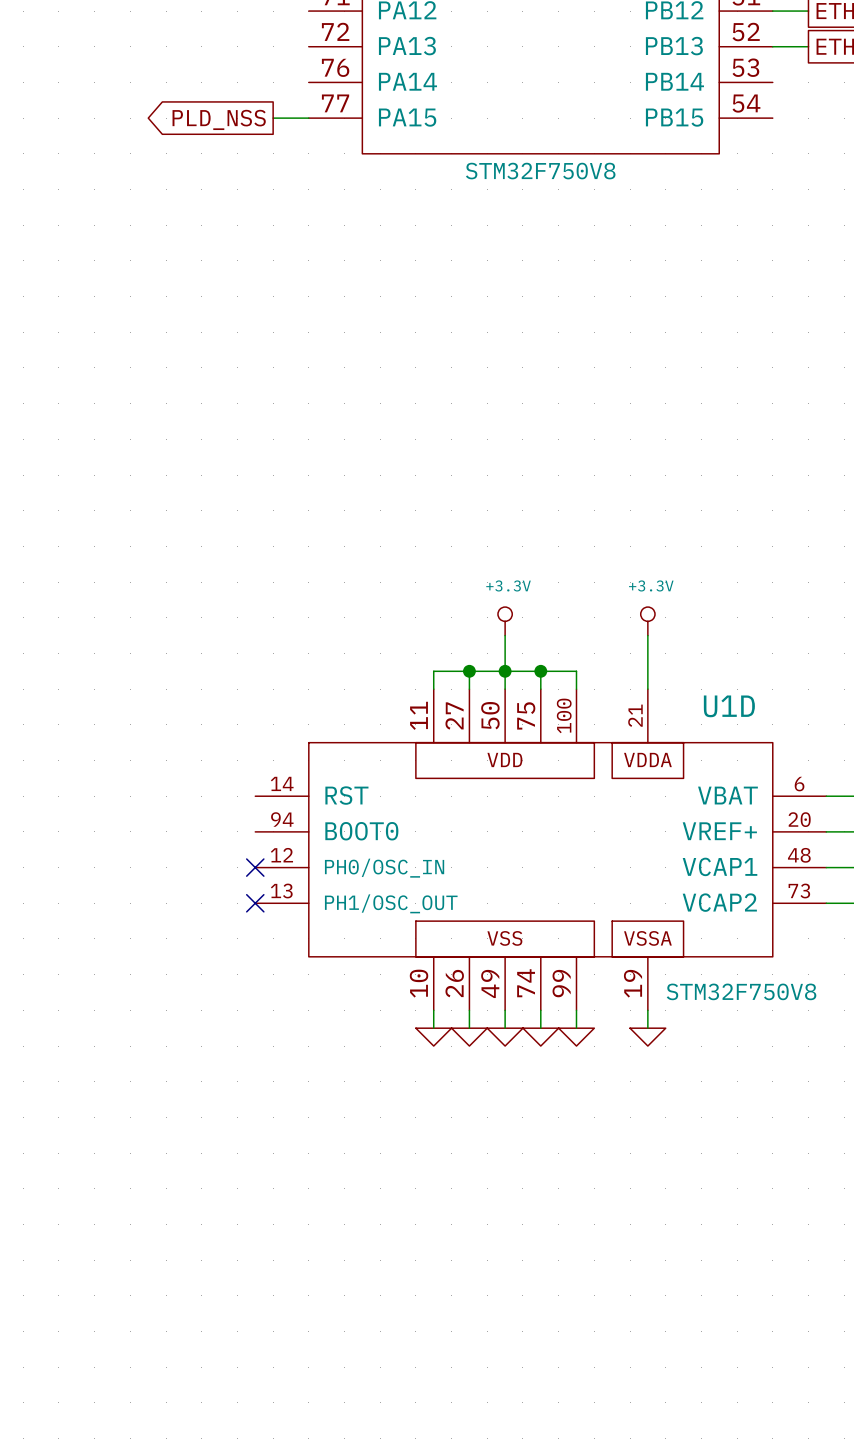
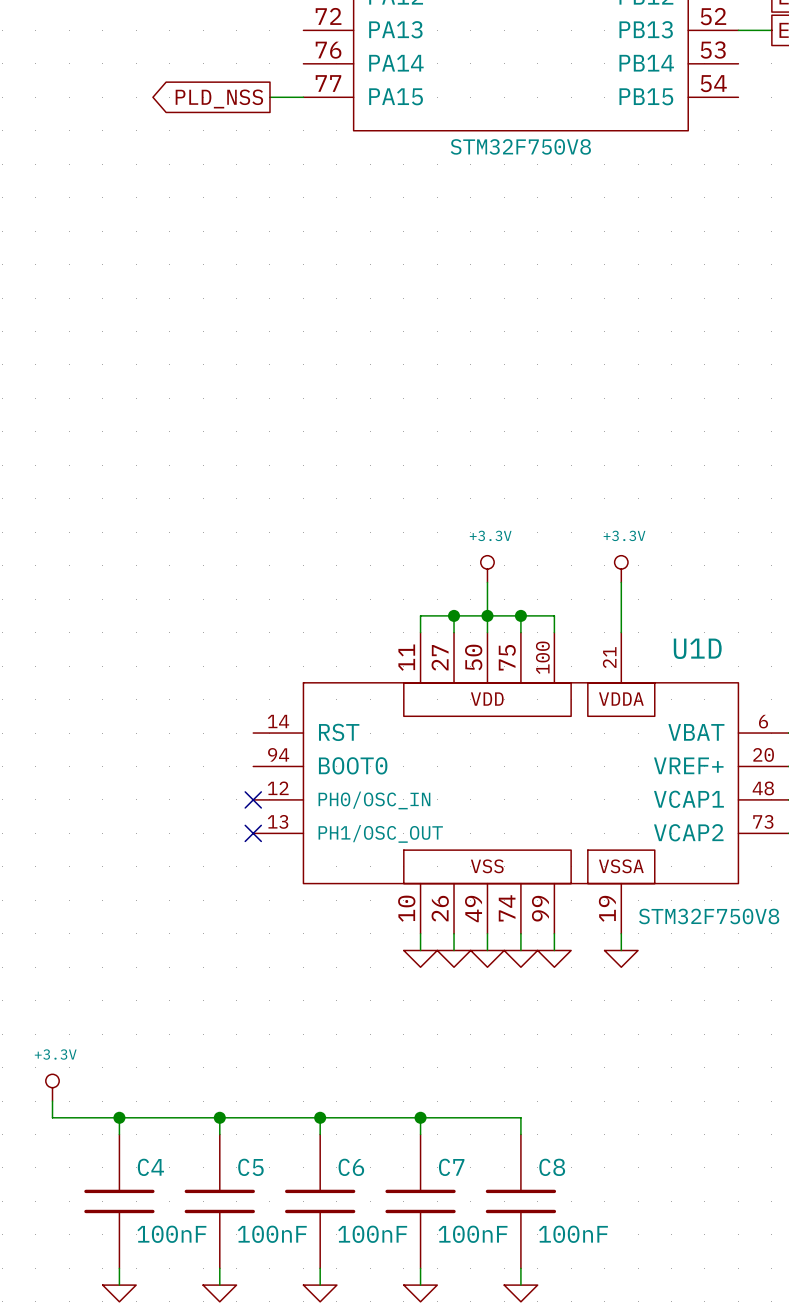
power symbol: none -> +3.3V (52, 1087)
wire: none -> (52, 1101) (52, 1117) (520, 1117) (520, 1134)
wire: none -> (119, 1117) (119, 1134)
junction: none -> (119, 1117)
wire: none -> (219, 1117) (219, 1134)
junction: none -> (219, 1117)
wire: none -> (320, 1117) (320, 1134)
junction: none -> (320, 1117)
wire: none -> (420, 1117) (420, 1134)
junction: none -> (420, 1117)
C4: none -> 100nF (119, 1201)
C5: none -> 100nF (219, 1201)
C6: none -> 100nF (320, 1201)
C7: none -> 100nF (420, 1201)
C8: none -> 100nF (520, 1201)
wire: none -> (119, 1268) (119, 1285)
wire: none -> (219, 1268) (219, 1285)
wire: none -> (320, 1268) (320, 1285)
wire: none -> (420, 1268) (420, 1285)
wire: none -> (520, 1268) (520, 1285)
power symbol: none -> (119, 1293)
power symbol: none -> (219, 1293)
power symbol: none -> (320, 1293)
power symbol: none -> (420, 1293)
power symbol: none -> (520, 1293)

